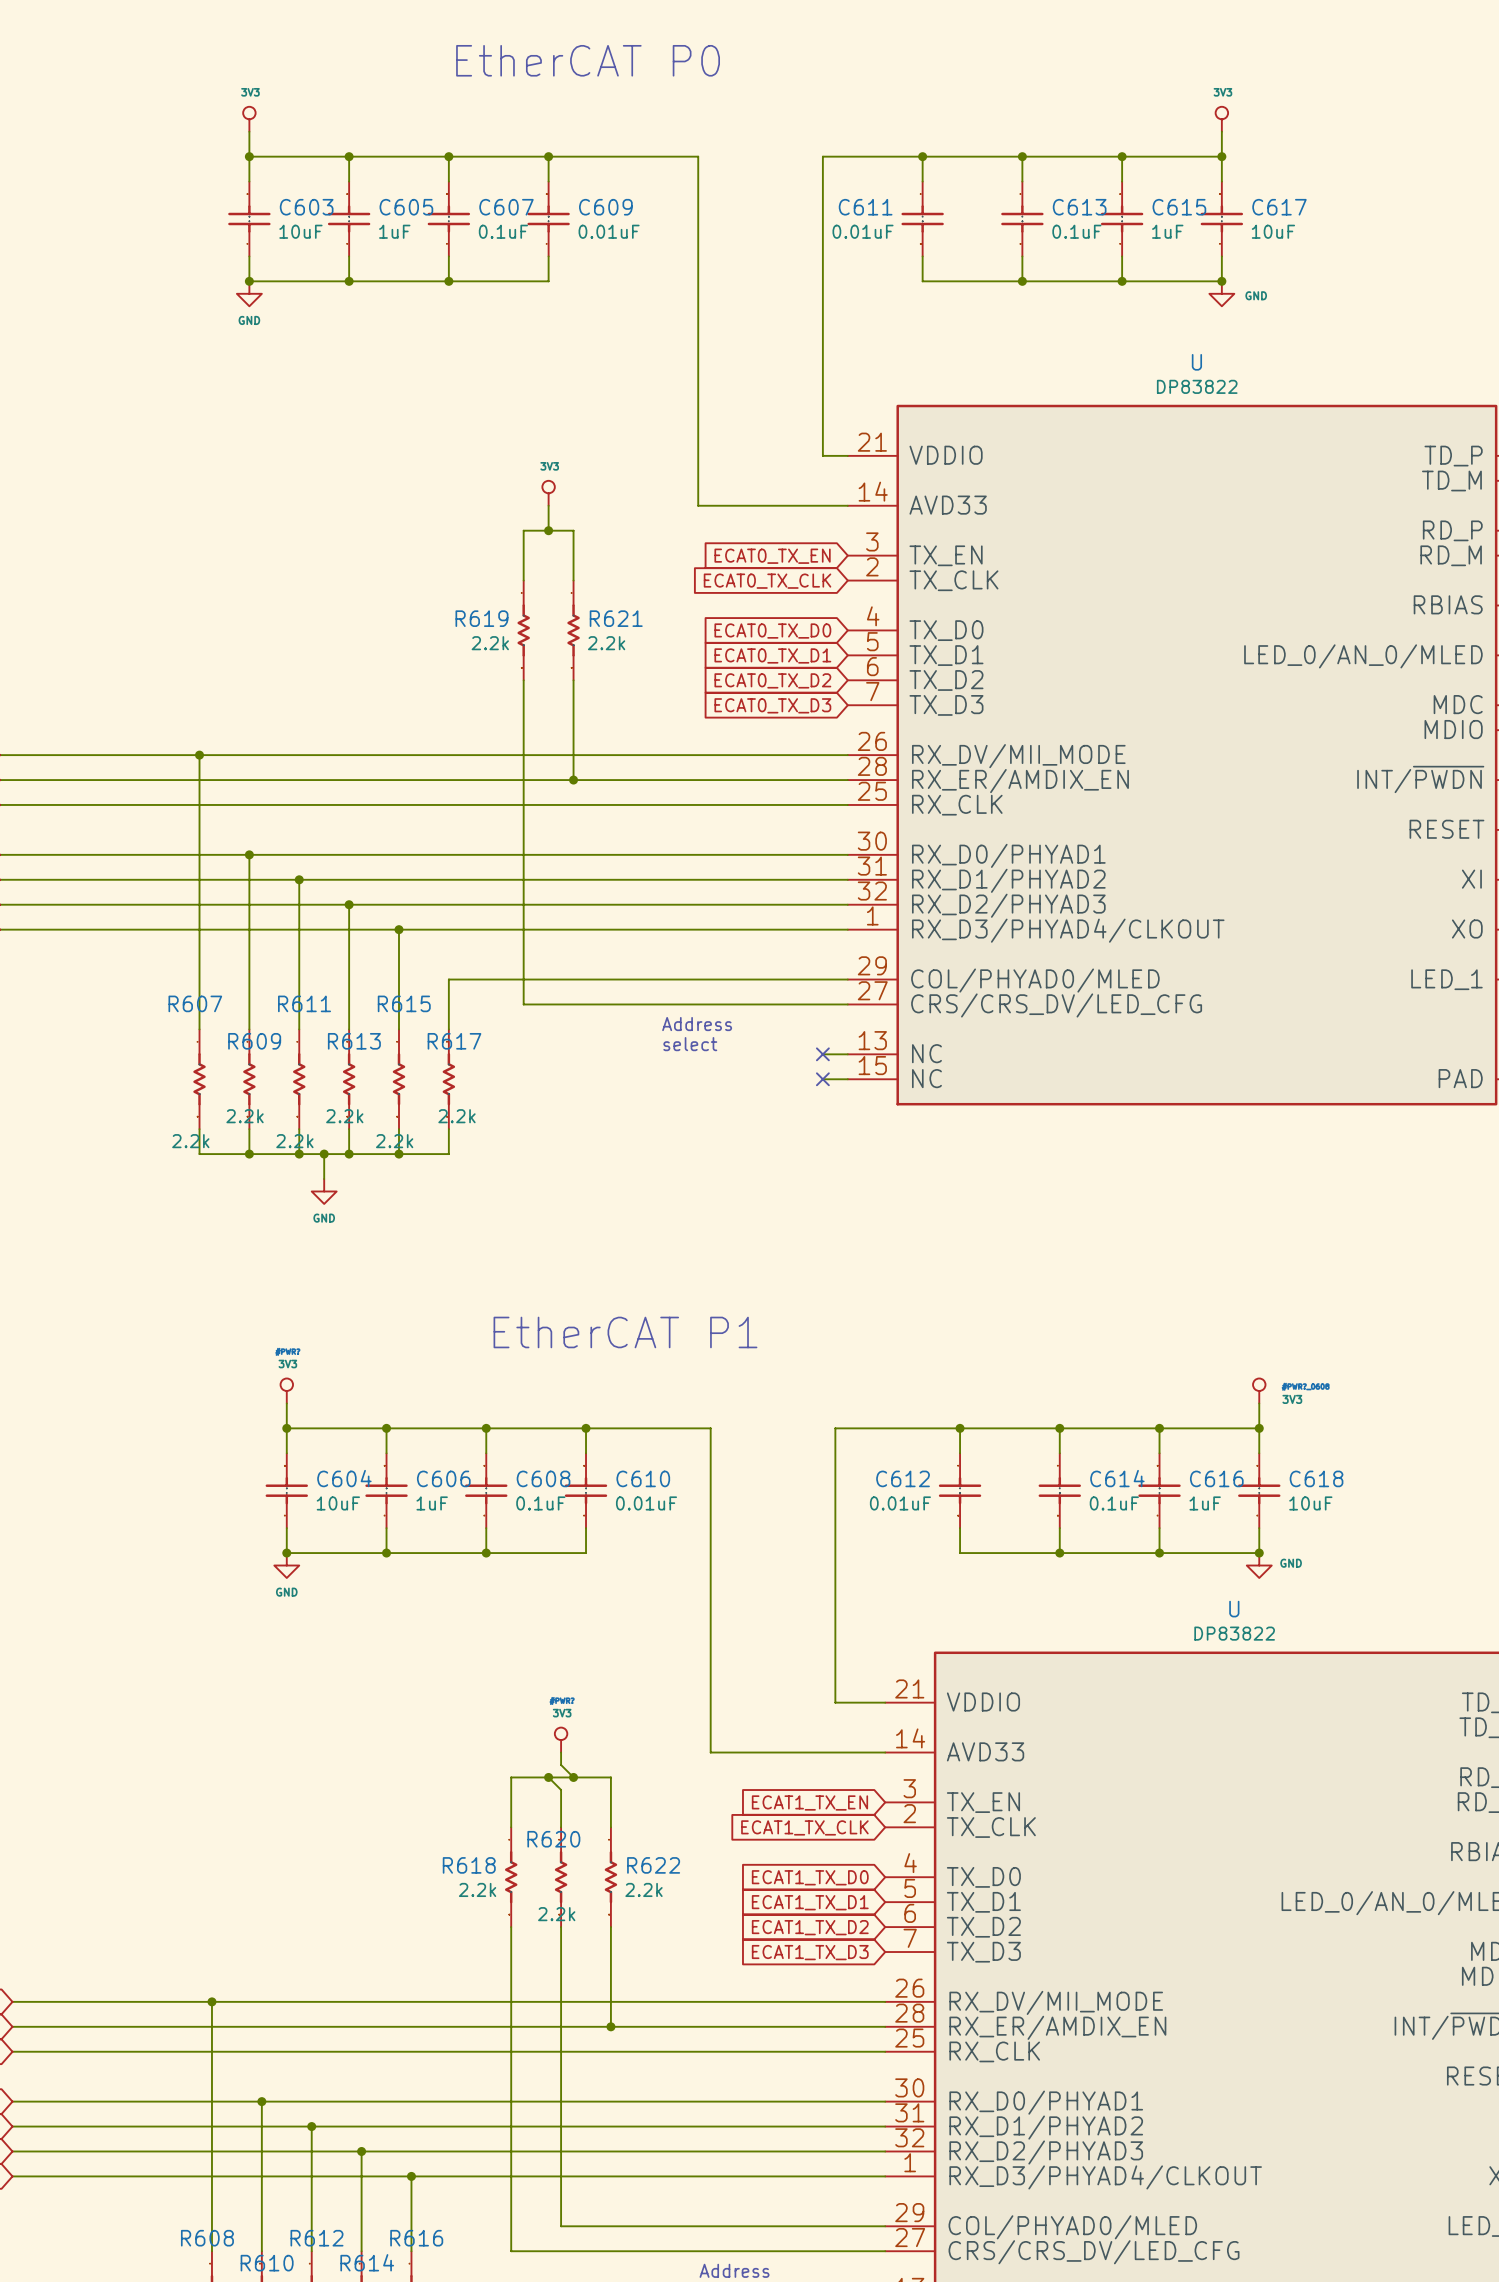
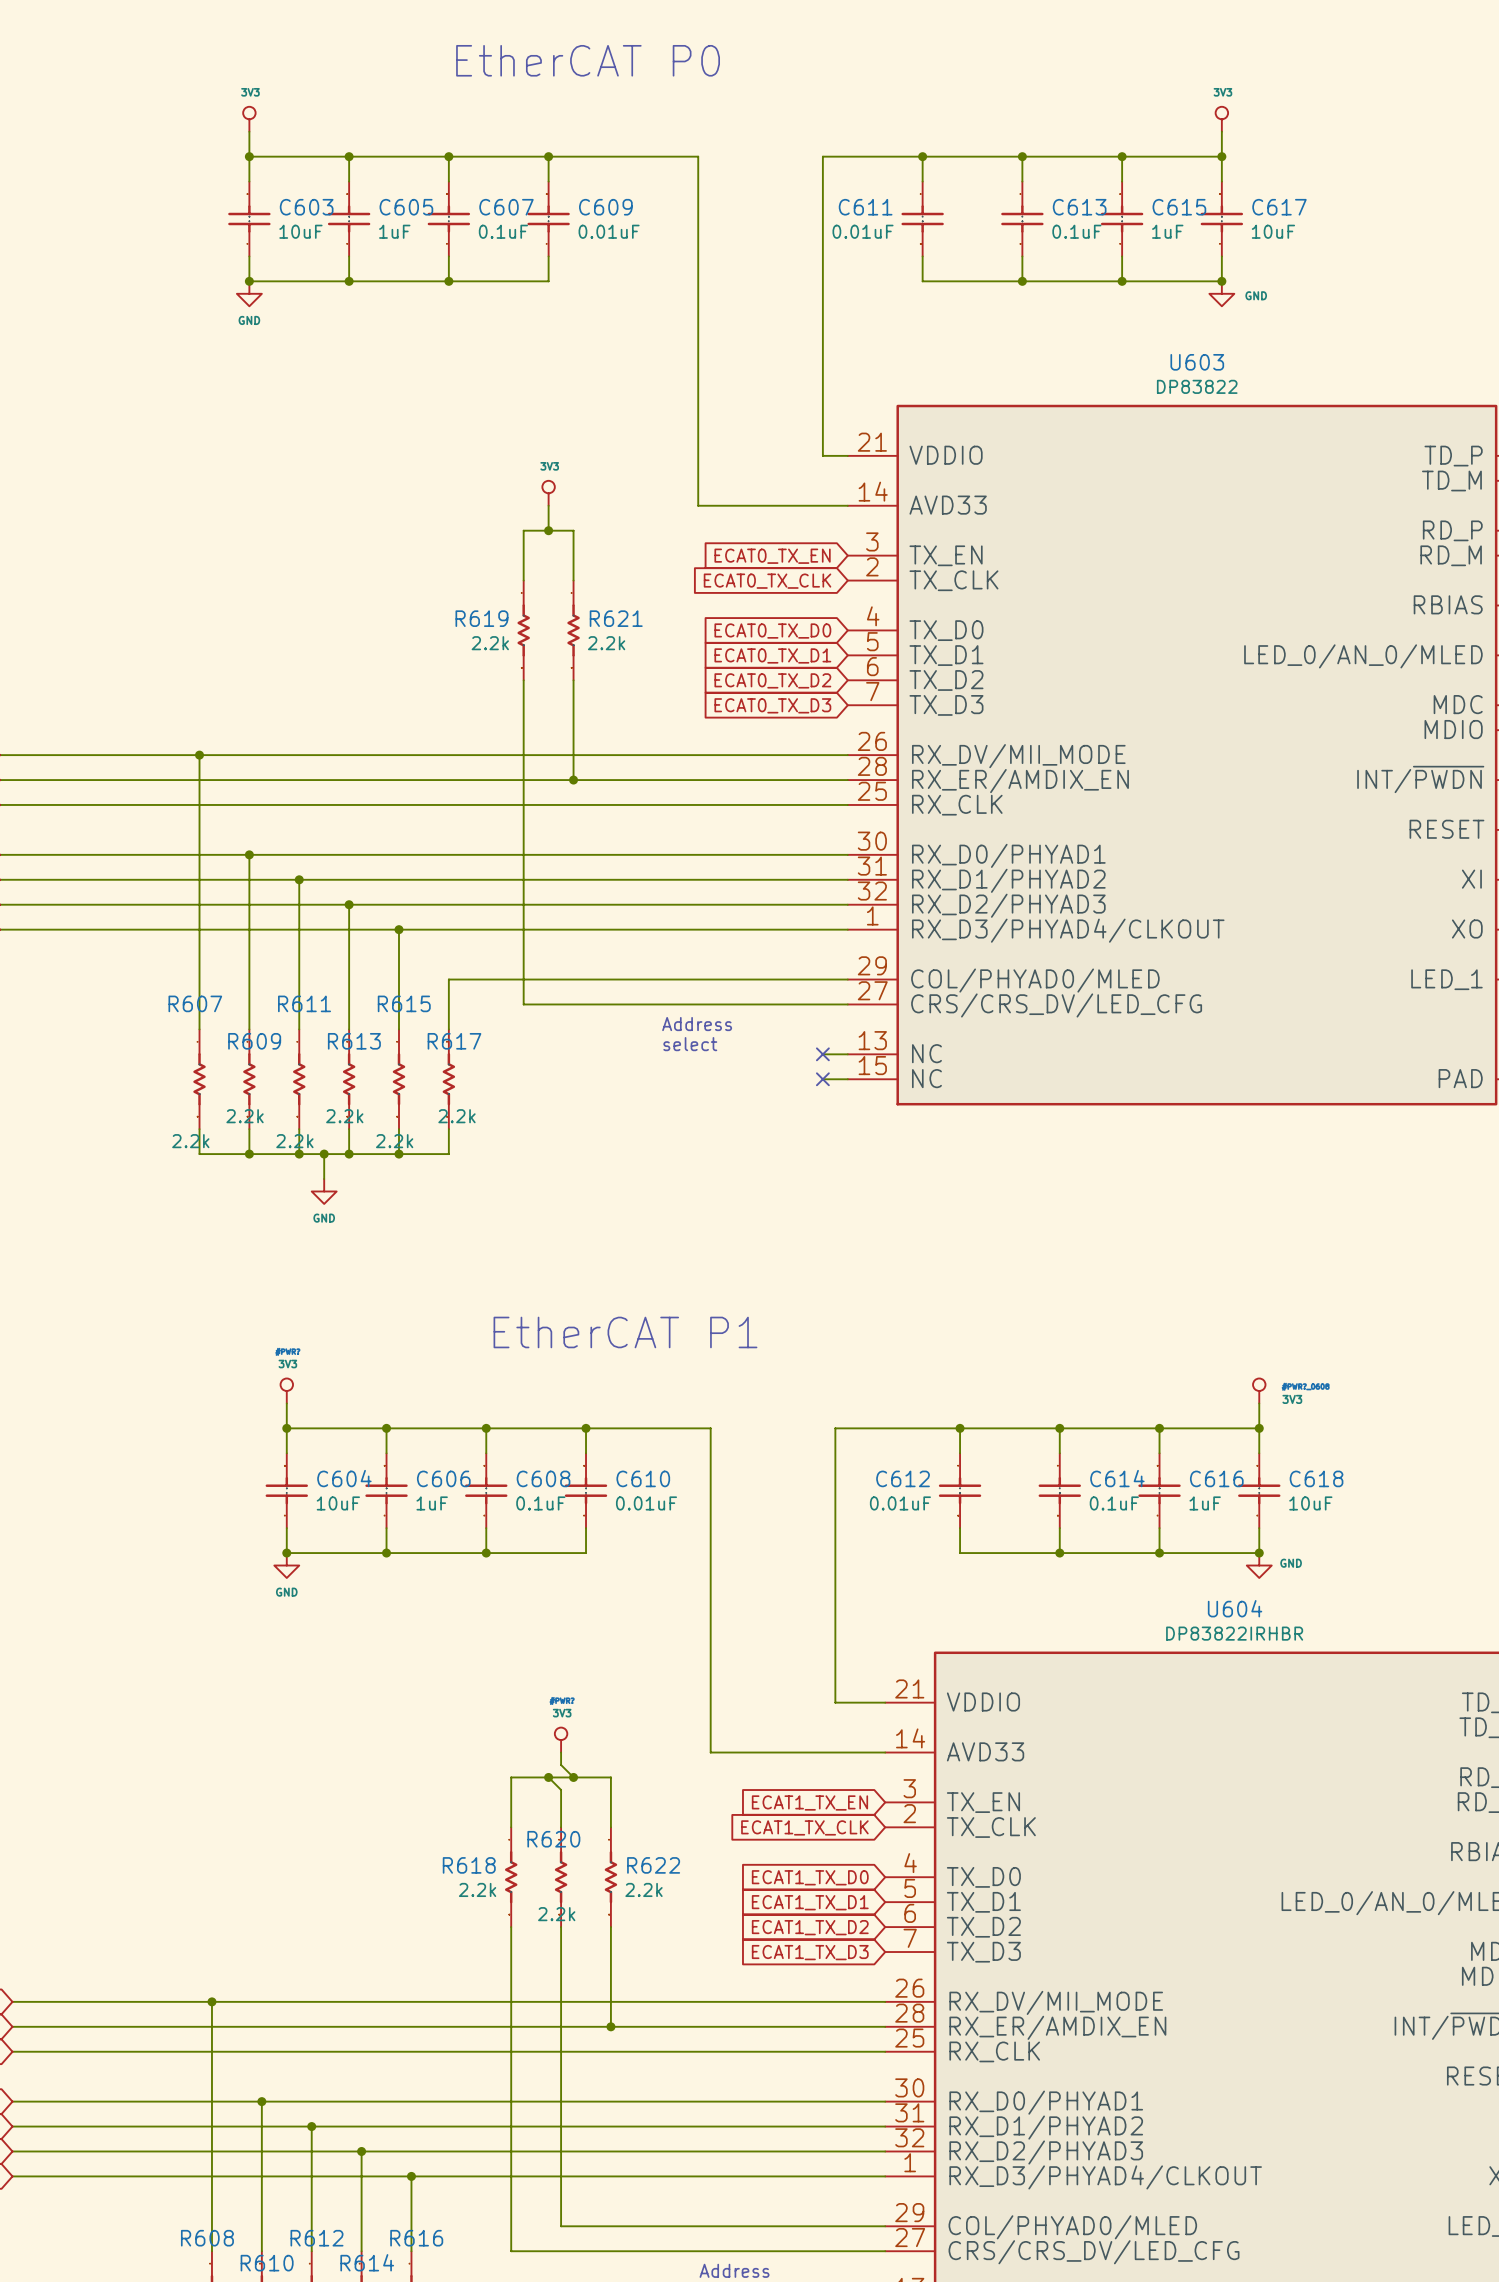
U name: U (1196, 362) -> U603 (1197, 362)
U name: U (1234, 1609) -> U604 (1235, 1608)
U value: DP83822 (1234, 1633) -> DP83822IRHBR (1234, 1633)

